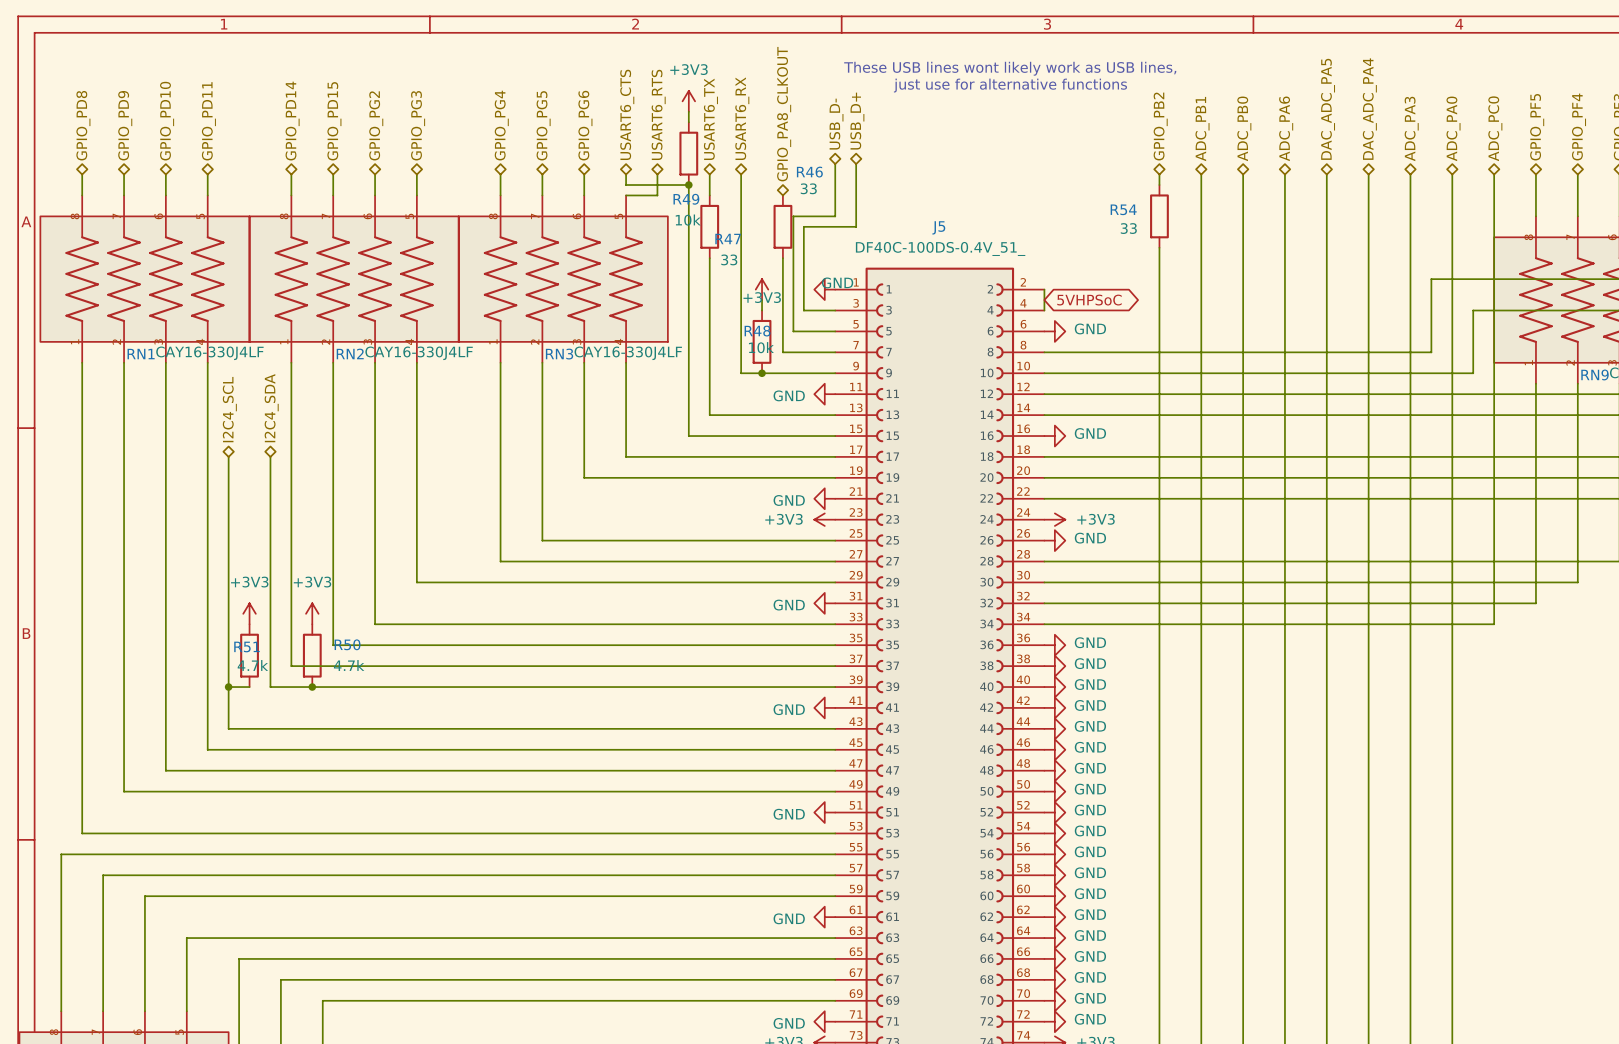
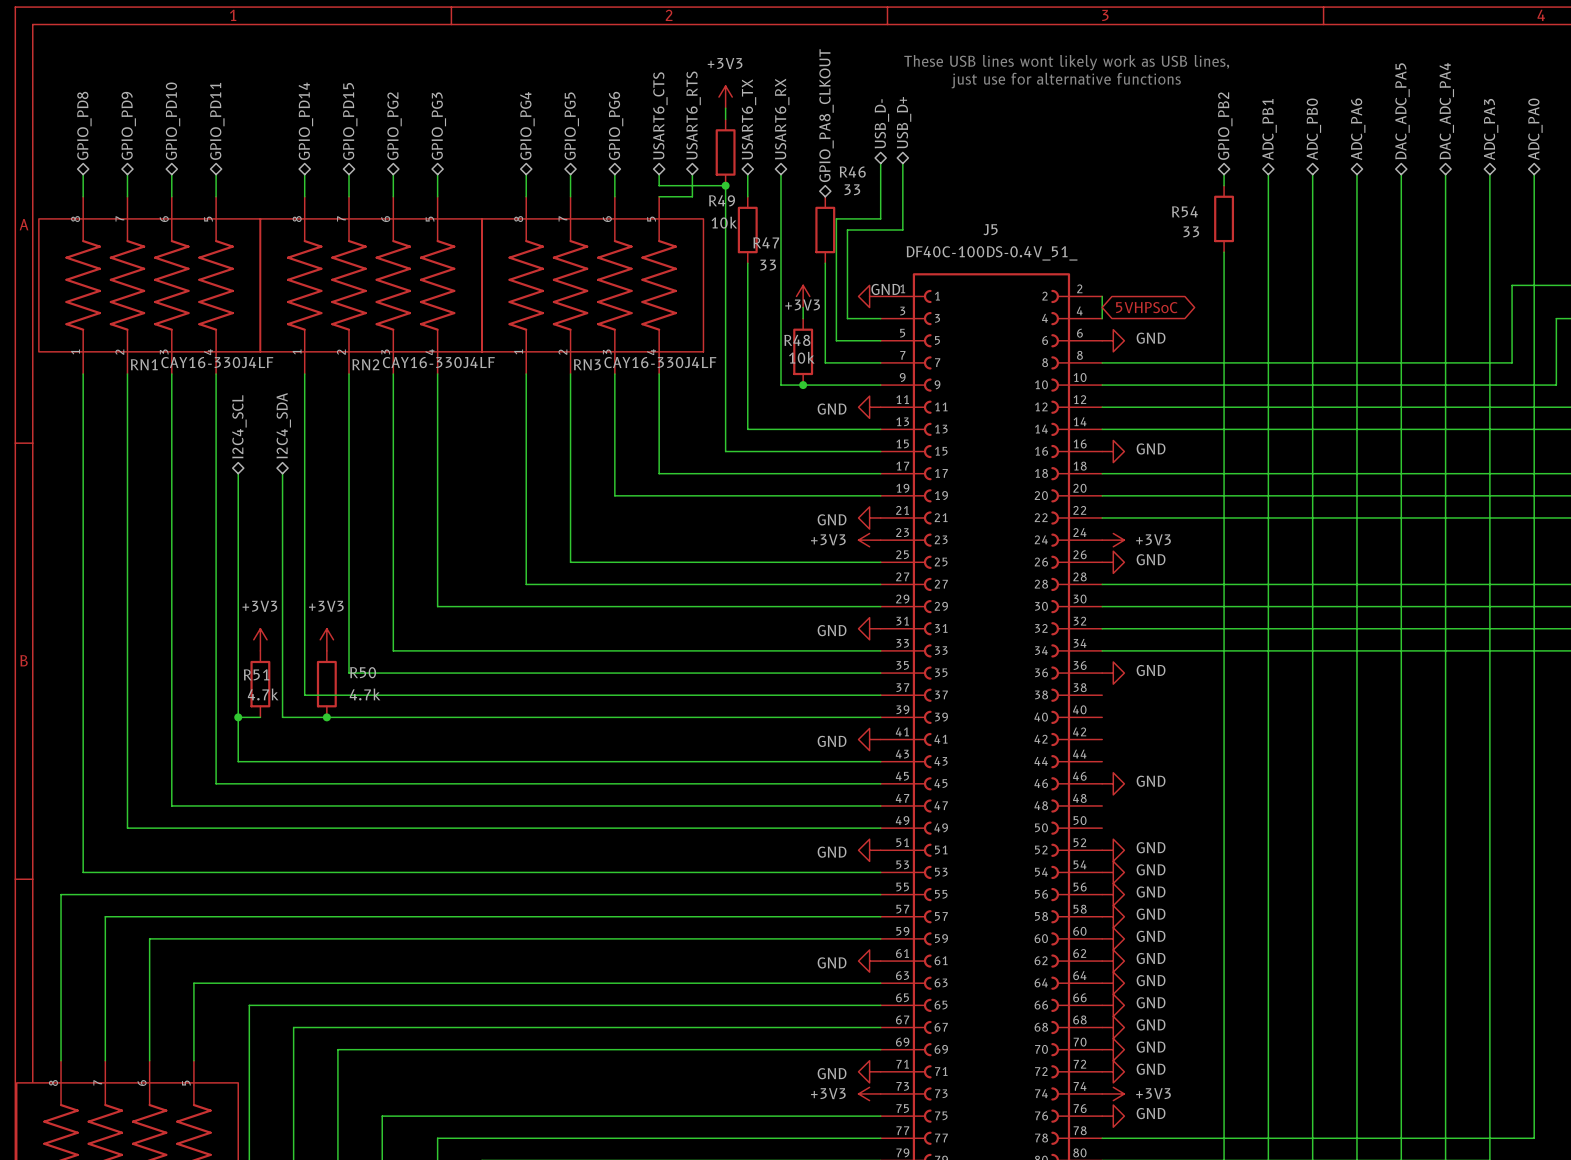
power symbol: GND (1054, 666) -> none
power symbol: GND (1054, 687) -> none
power symbol: GND (1054, 707) -> none
power symbol: GND (1054, 728) -> none
power symbol: GND (1054, 770) -> none
power symbol: GND (1054, 791) -> none

